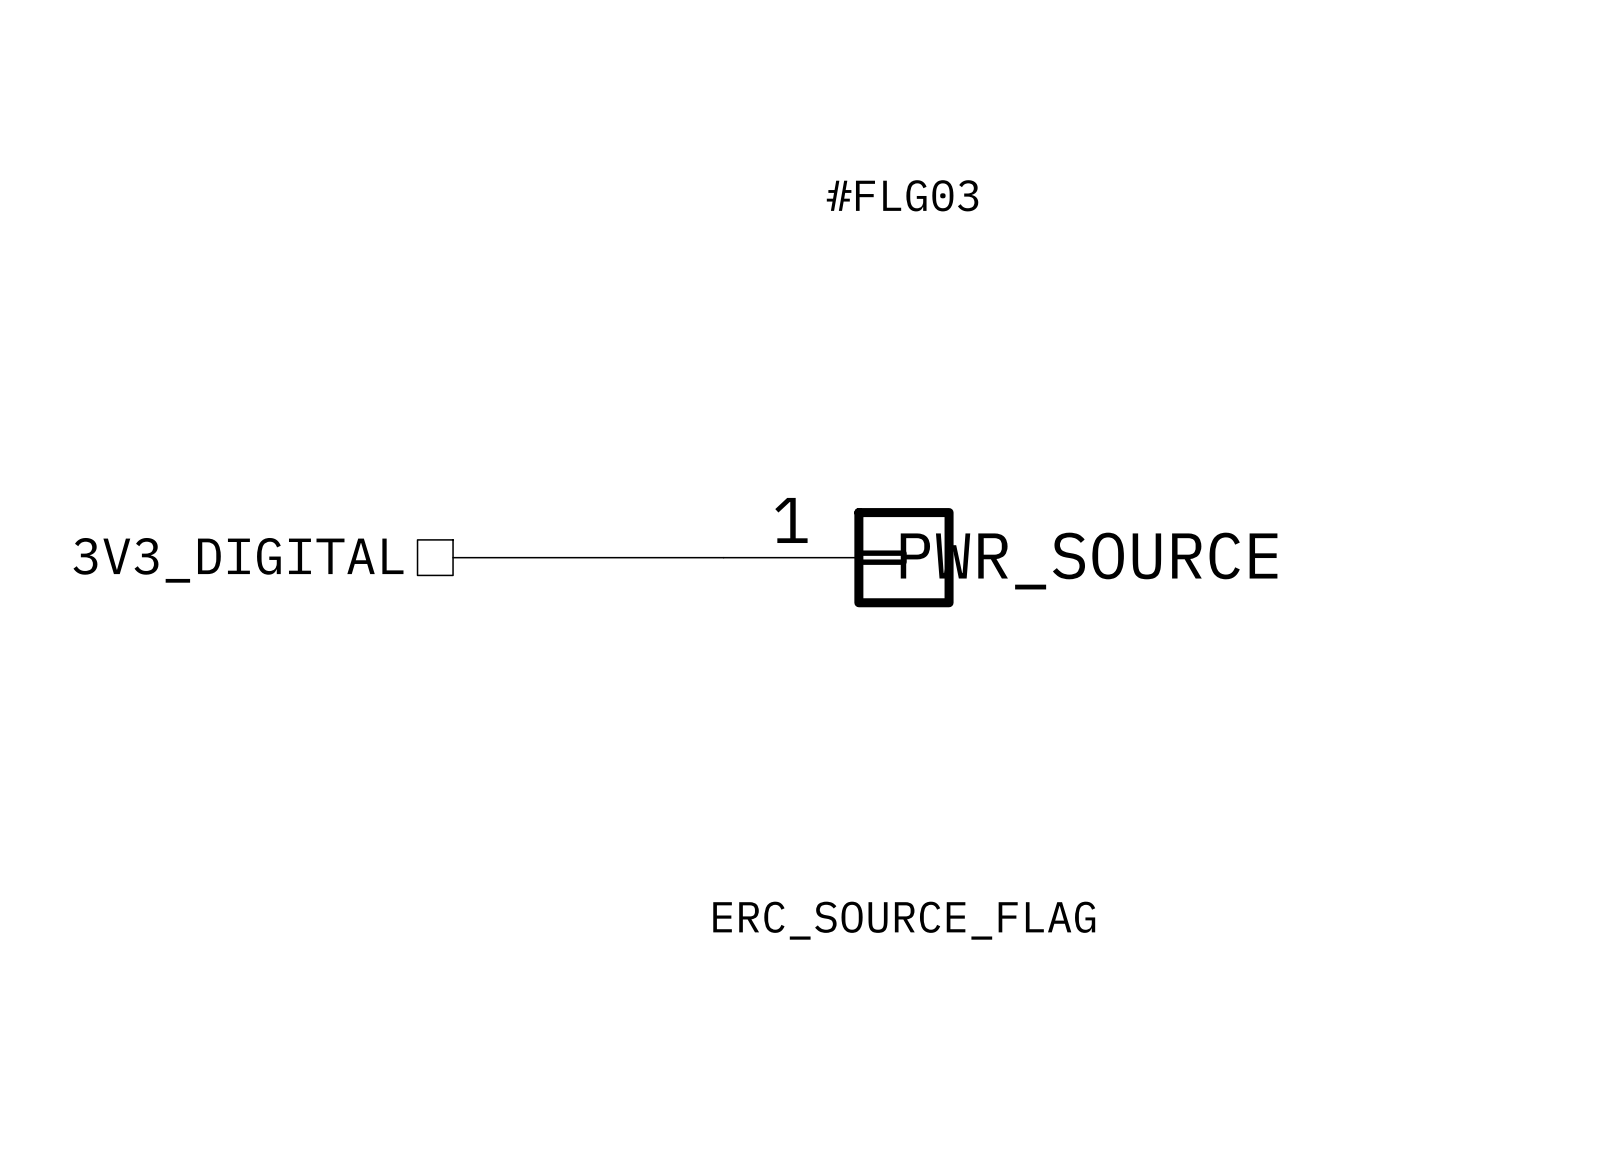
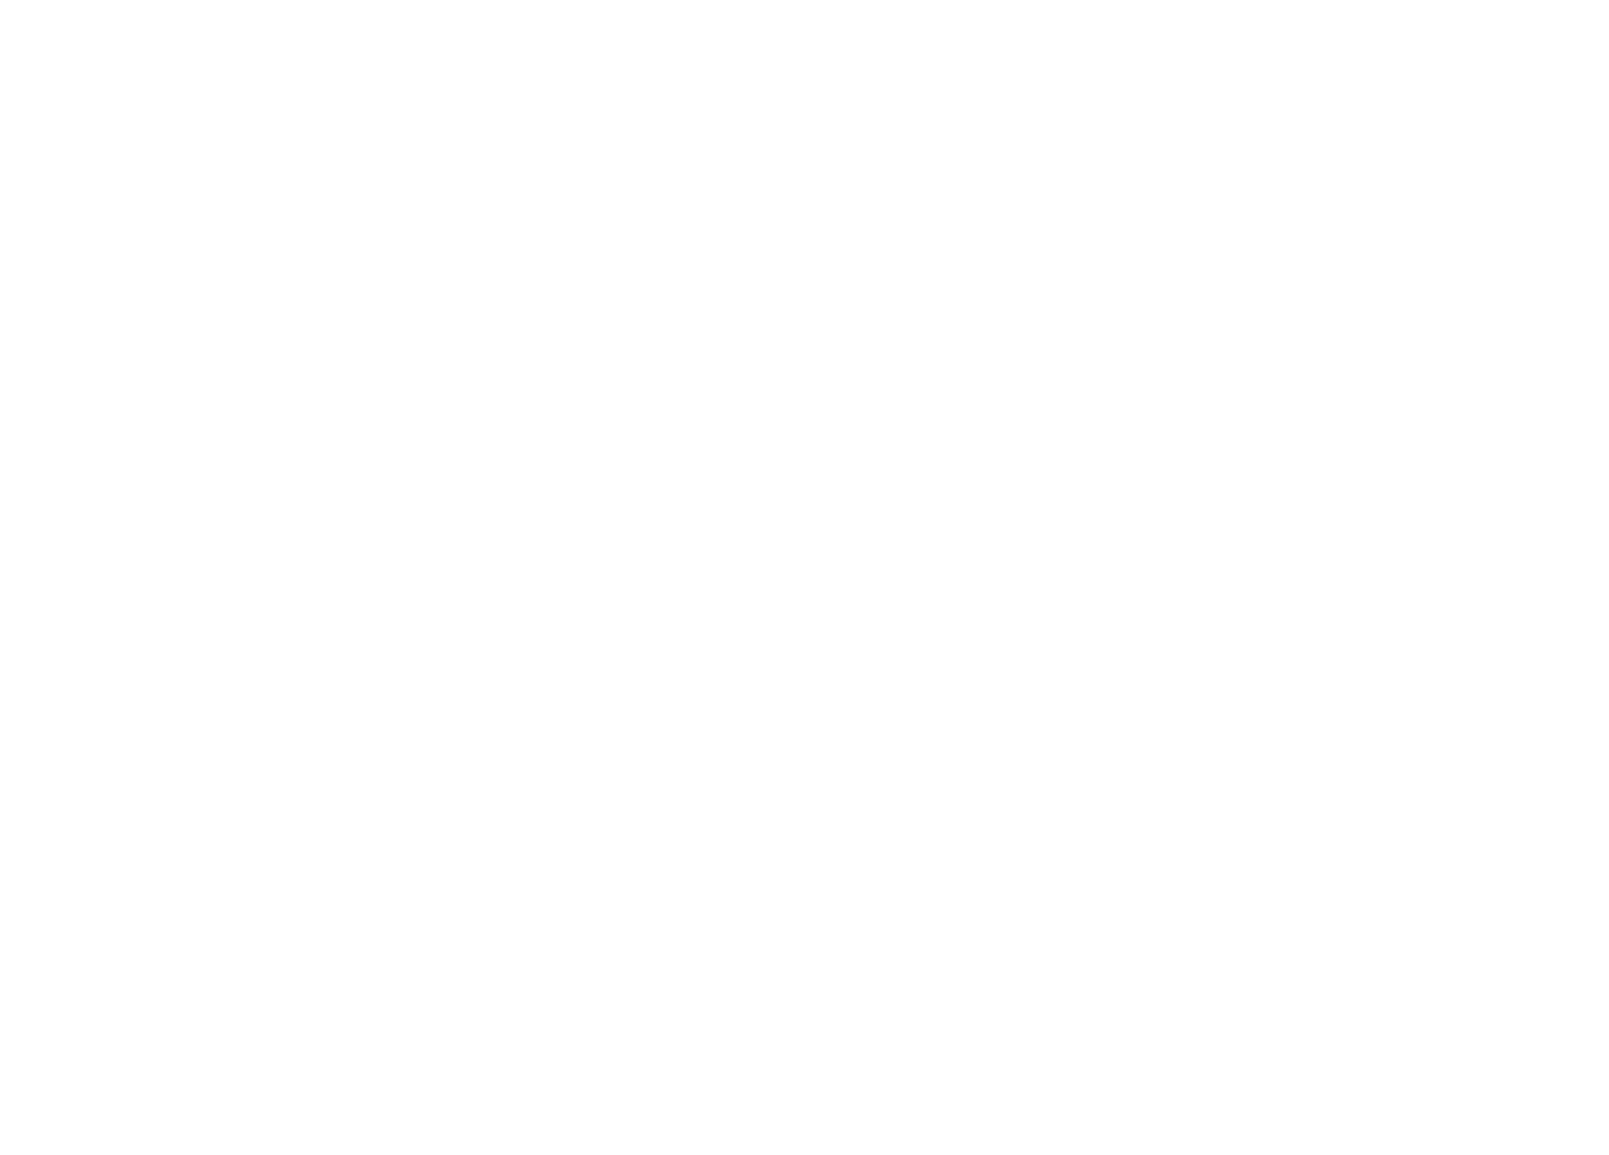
wire: (453, 557) (723, 557) -> none
#FLG03: ERC_SOURCE_FLAG (838, 557) -> none
hierarchical label: 3V3_DIGITAL (238, 560) -> none

